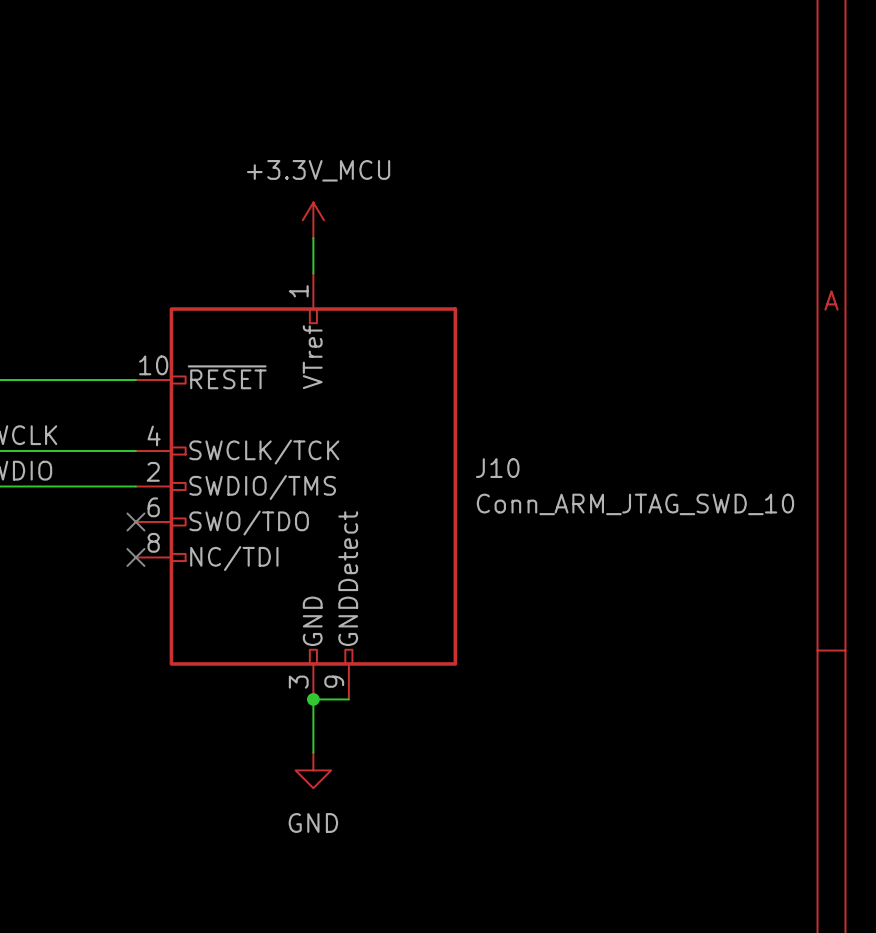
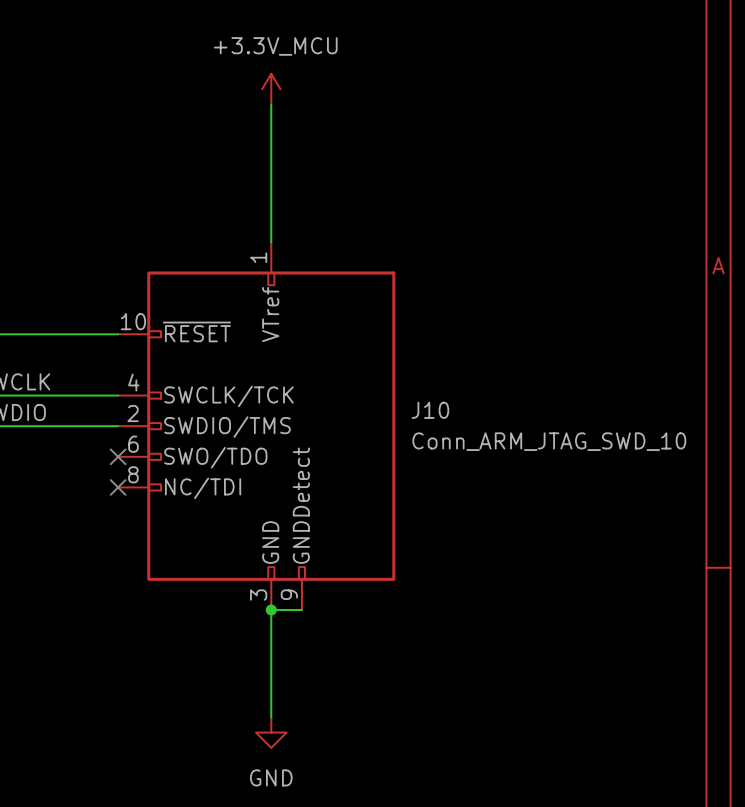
wire: none -> (271, 104) (271, 211)
power symbol position: +3.3V_MCU (313, 220) -> +3.3V_MCU (271, 89)
wire: none -> (271, 655) (271, 717)
power symbol position: GND (313, 770) -> GND (271, 732)

